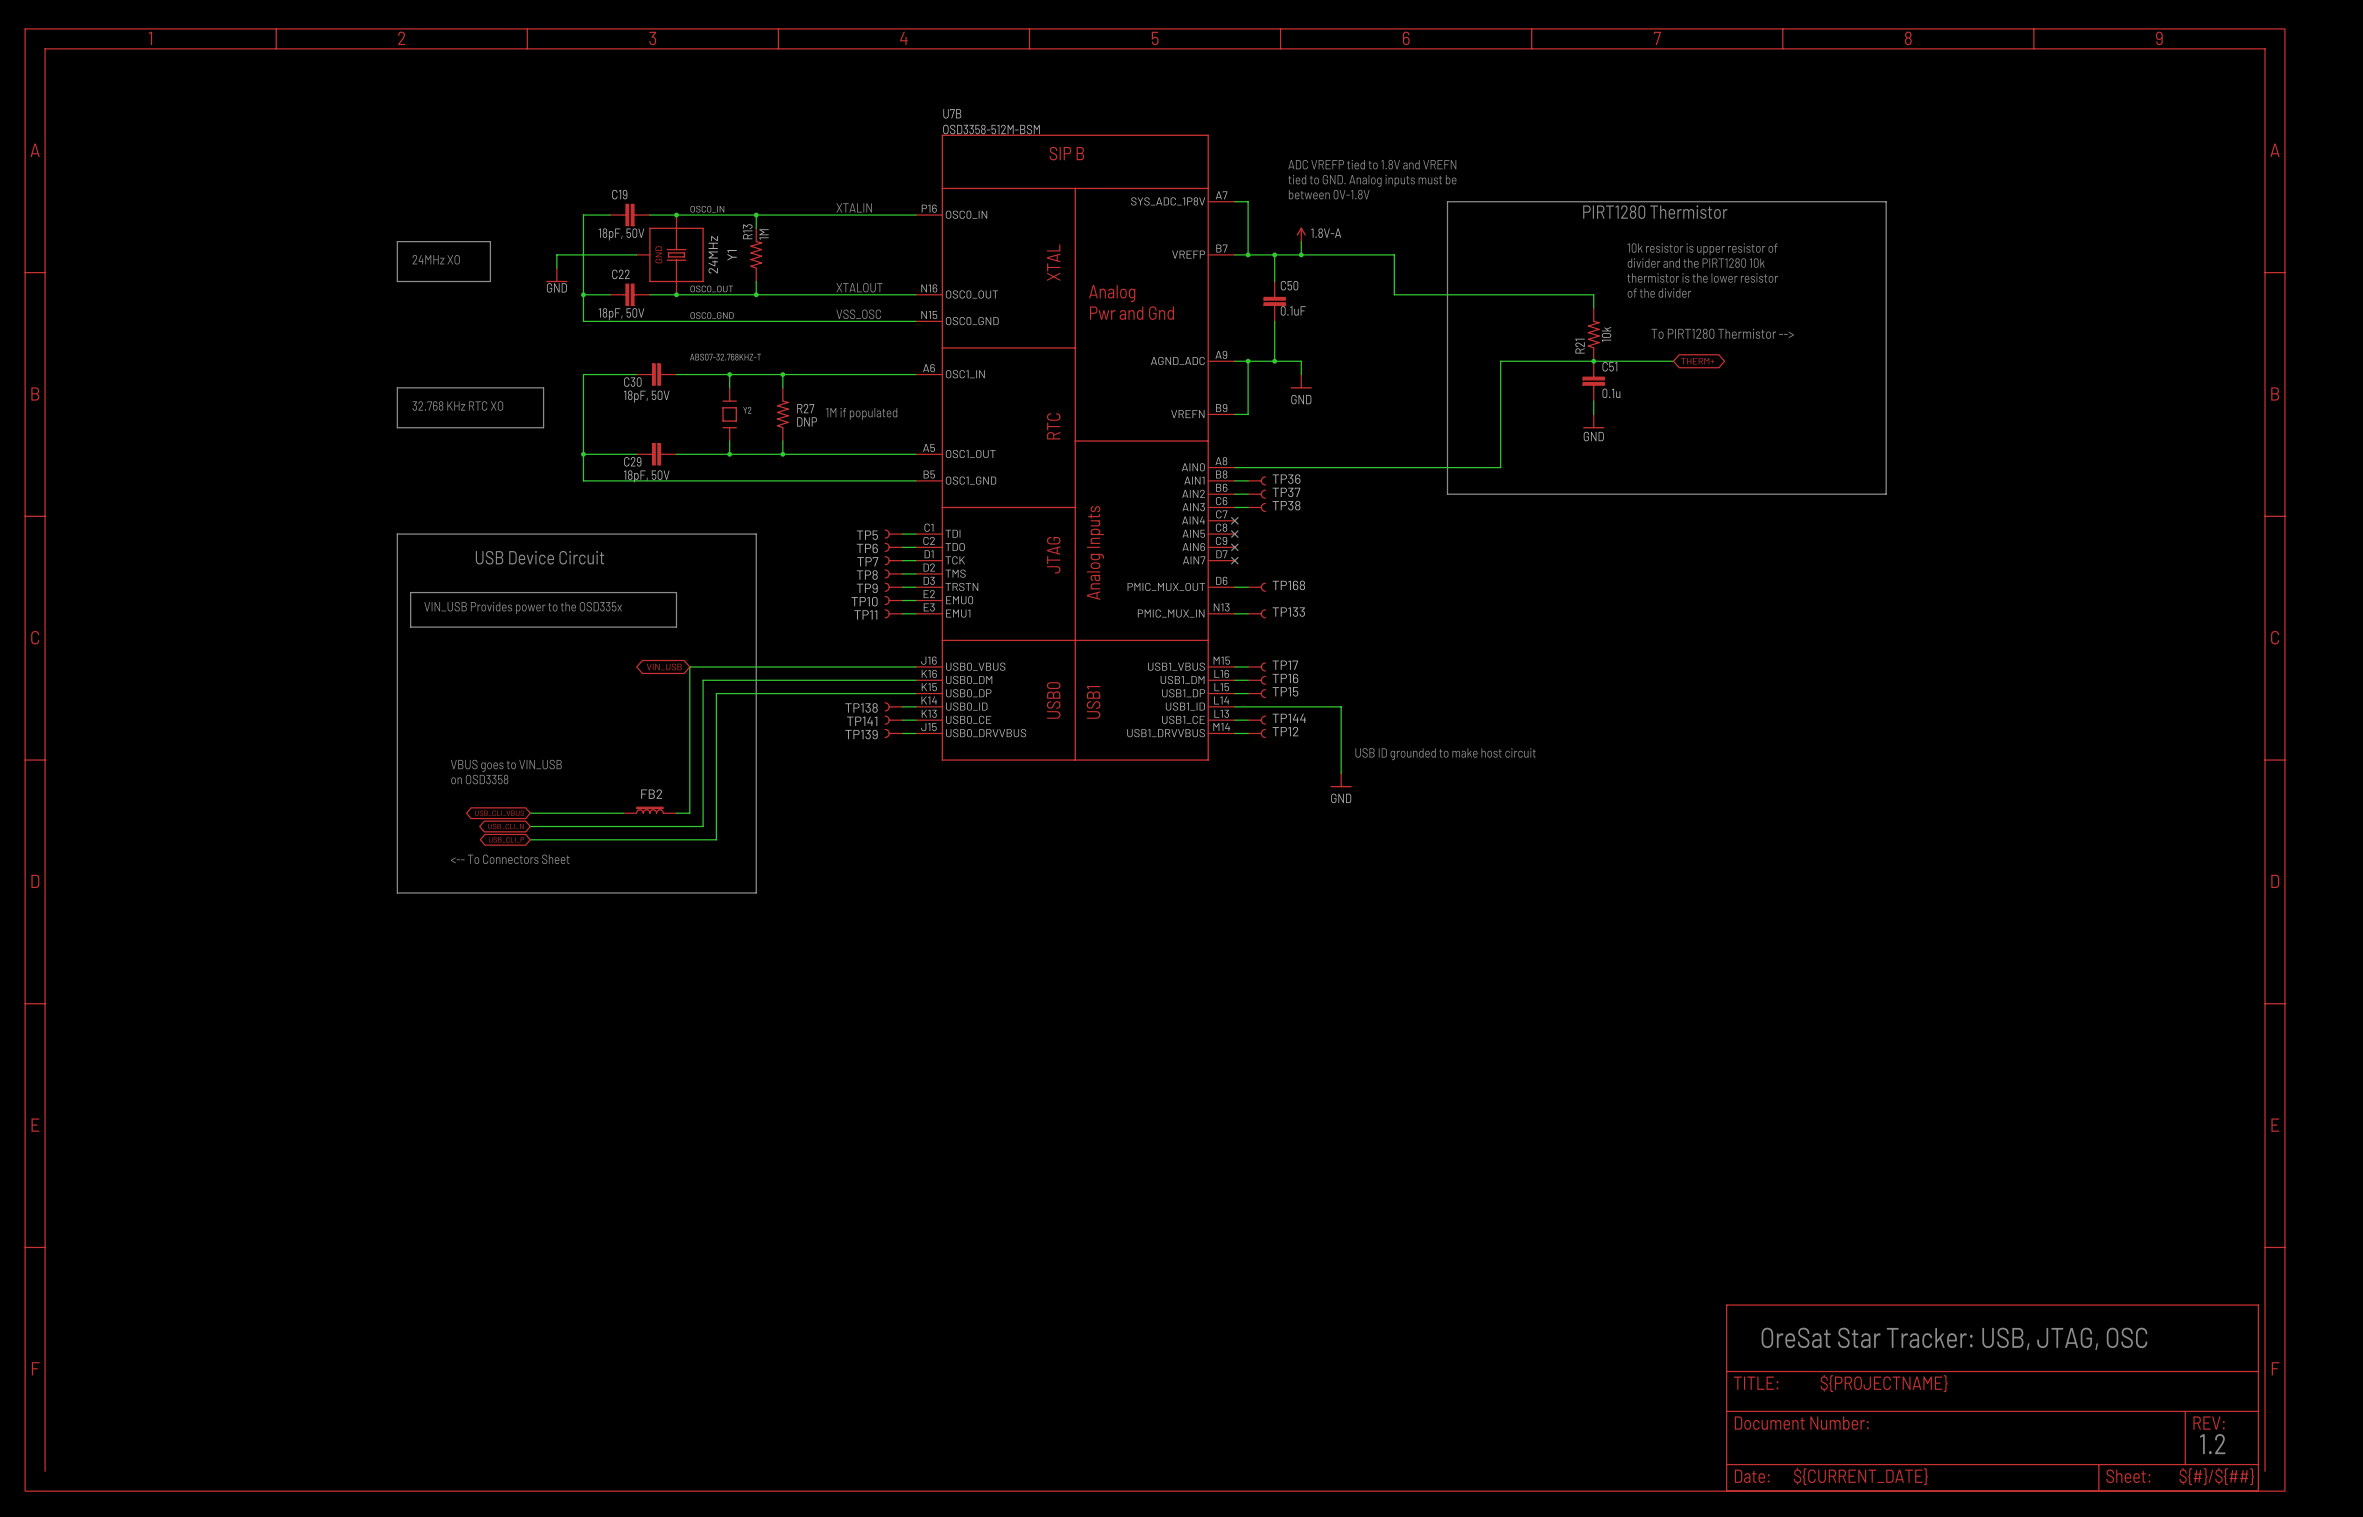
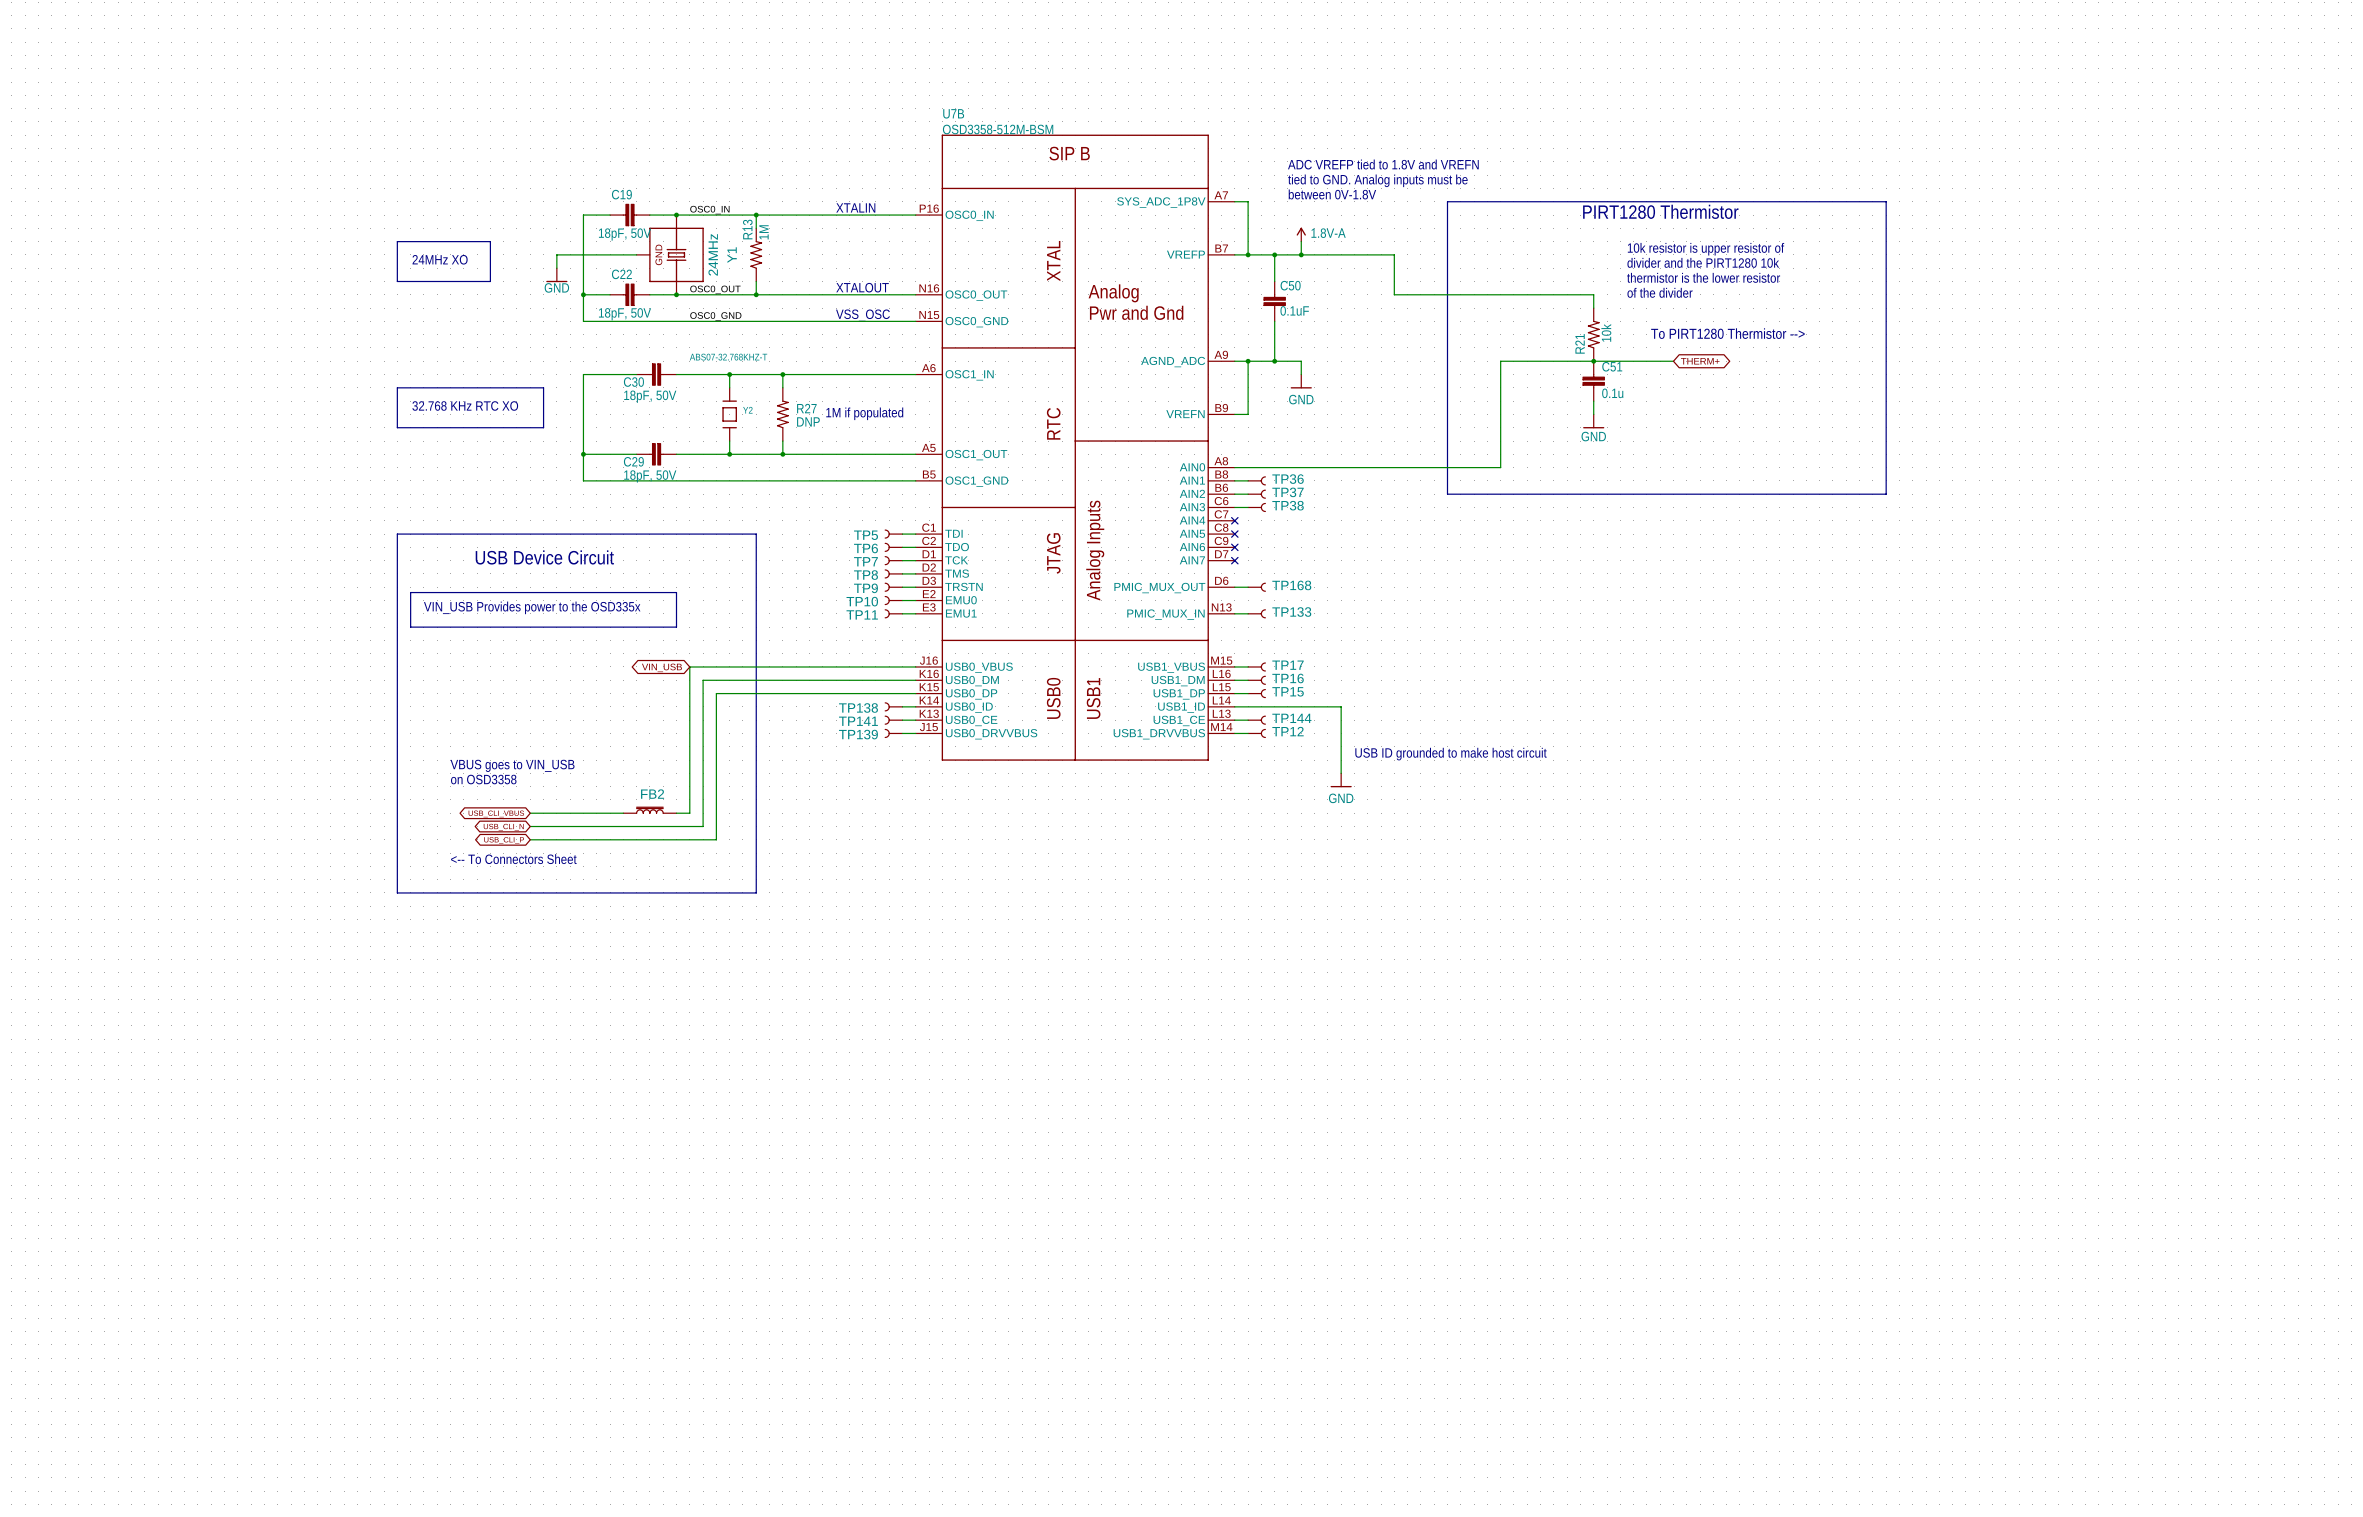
power symbol: (1155, 760) -> none
text: OreSat Star Tracker: USB, JTAG, OSC (1954, 1338) -> none
power symbol: (1992, 1398) -> none
text: 1.2 (2212, 1444) -> none

